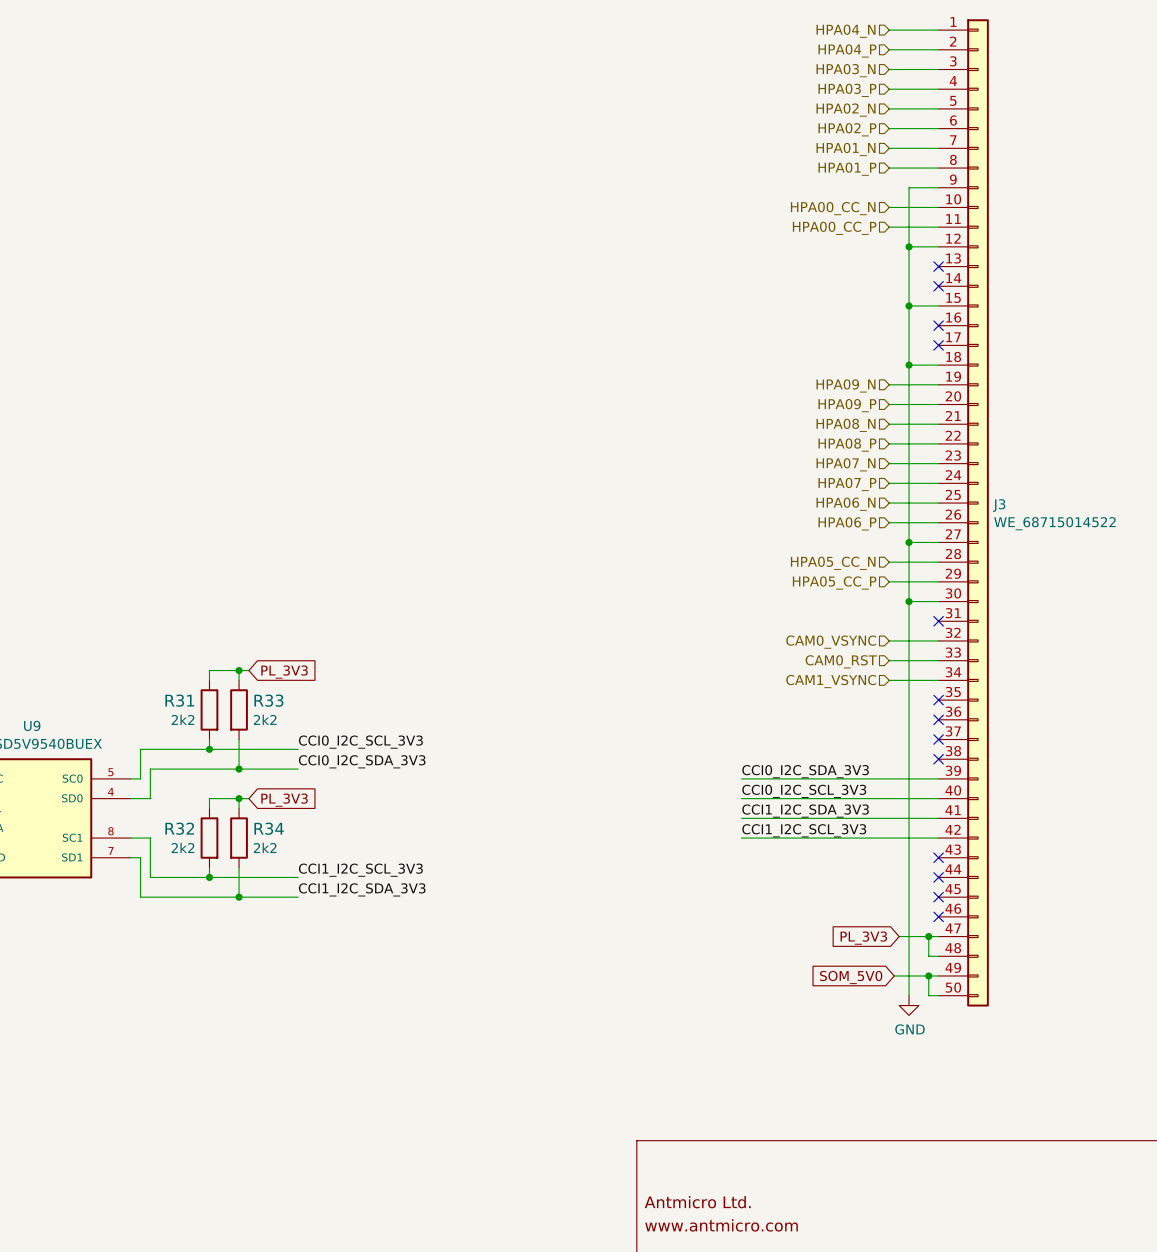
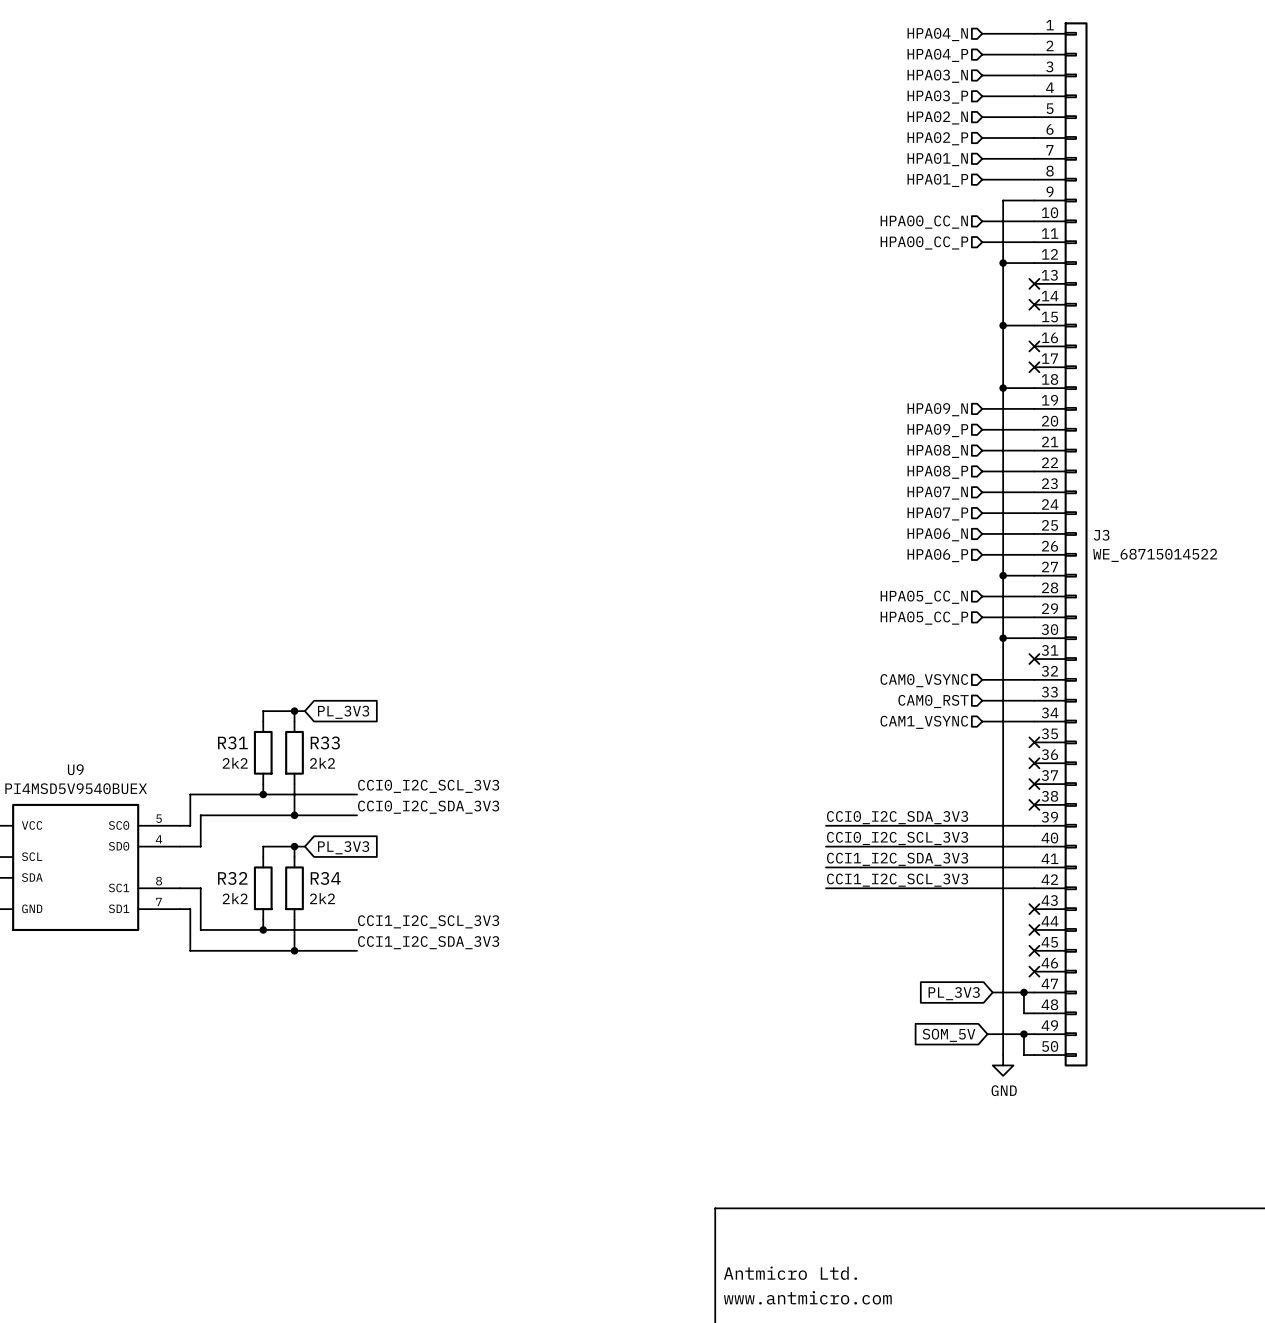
global label: SOM_5V0 (851, 977) -> SOM_5V (948, 1035)

